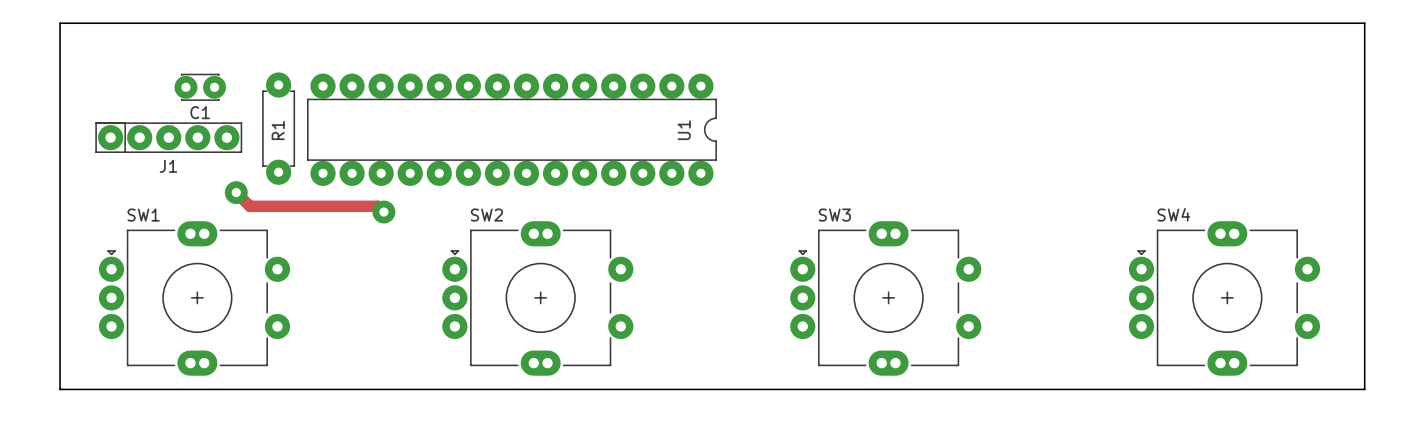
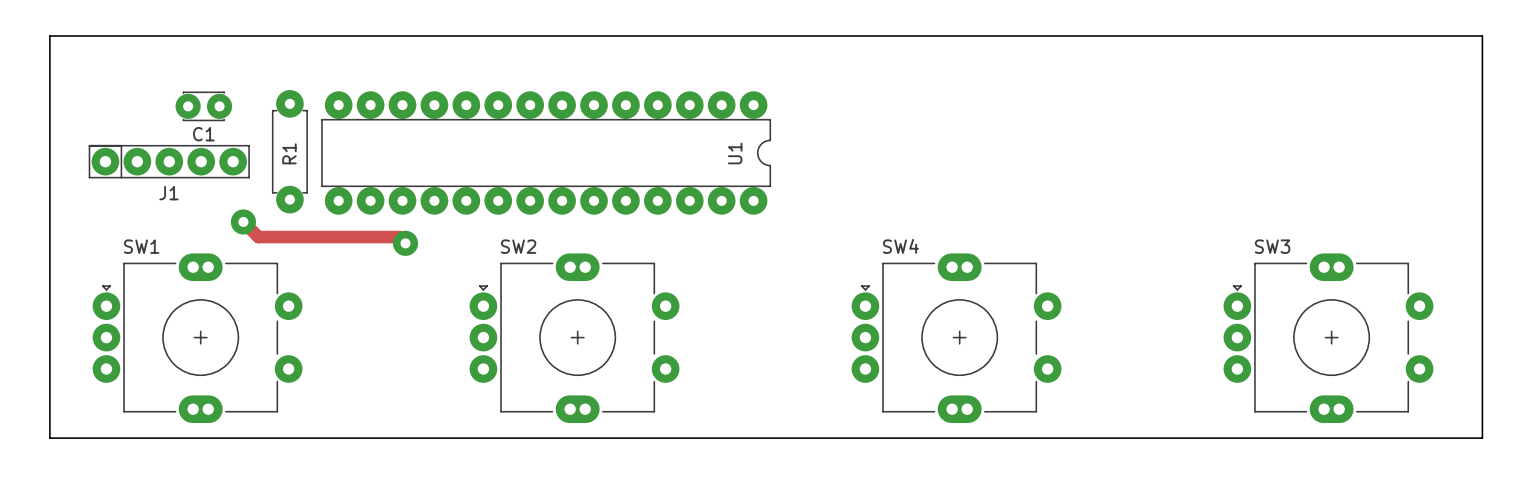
SW4 name: SW4 (1173, 214) -> SW3 (1272, 246)
SW3 name: SW3 (834, 215) -> SW4 (900, 246)

